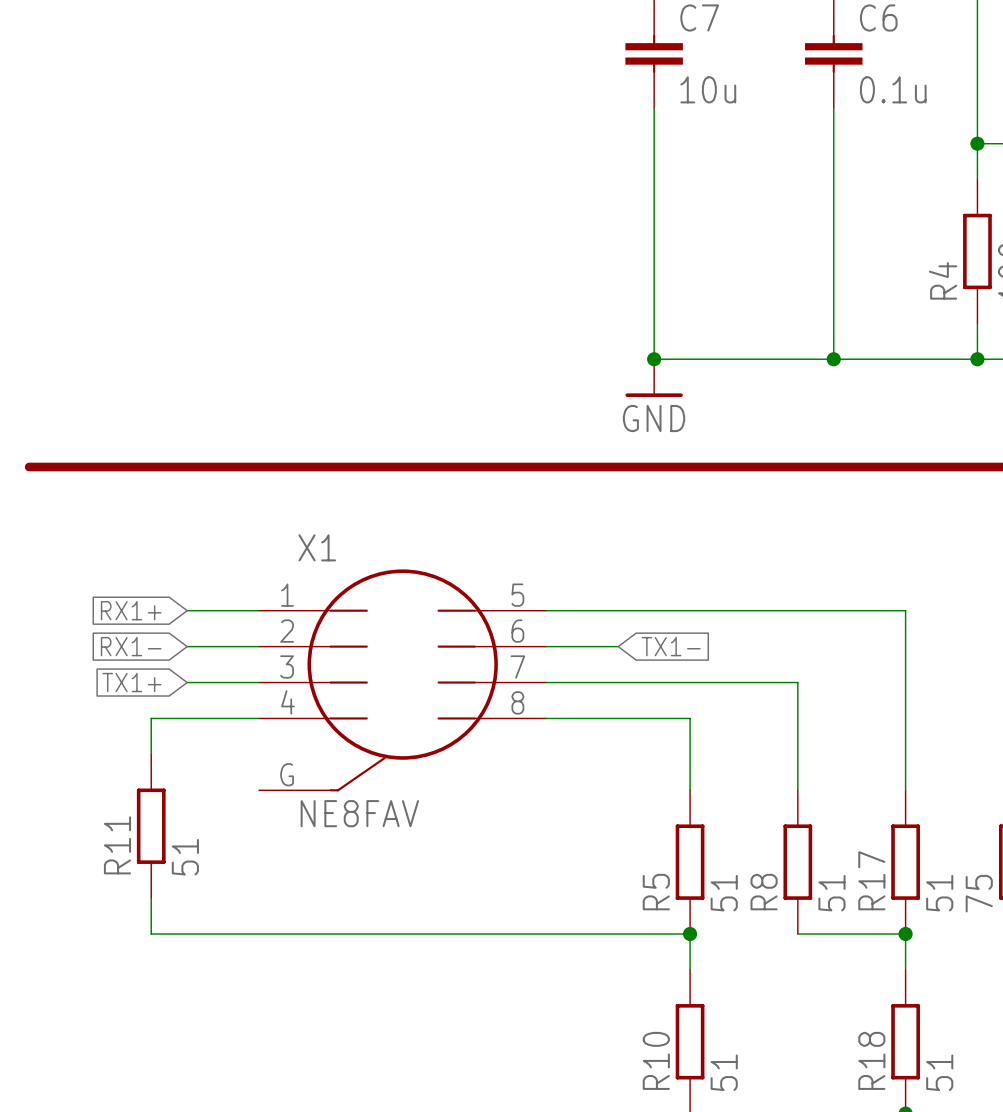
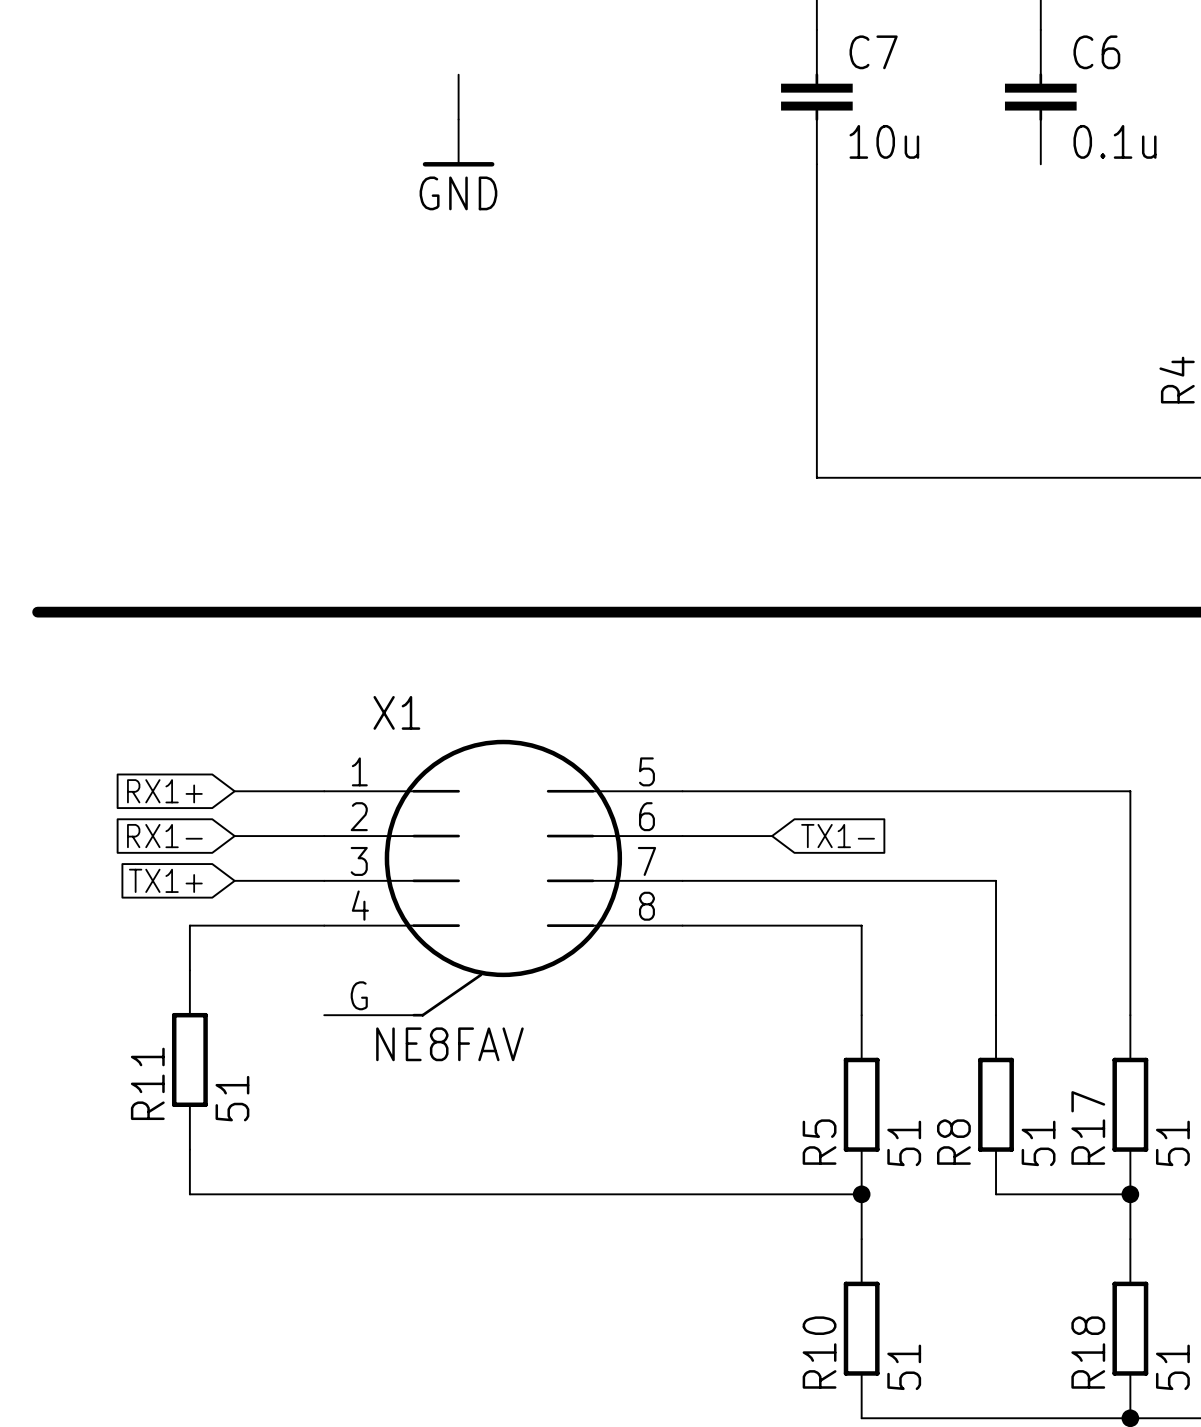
wire: none -> (458, 74) (458, 119)
power symbol: none -> GND (458, 143)
wire: (833, 107) (833, 359) -> none
junction: (654, 359) -> none
junction: (833, 359) -> none
power symbol: GND (654, 378) -> none

